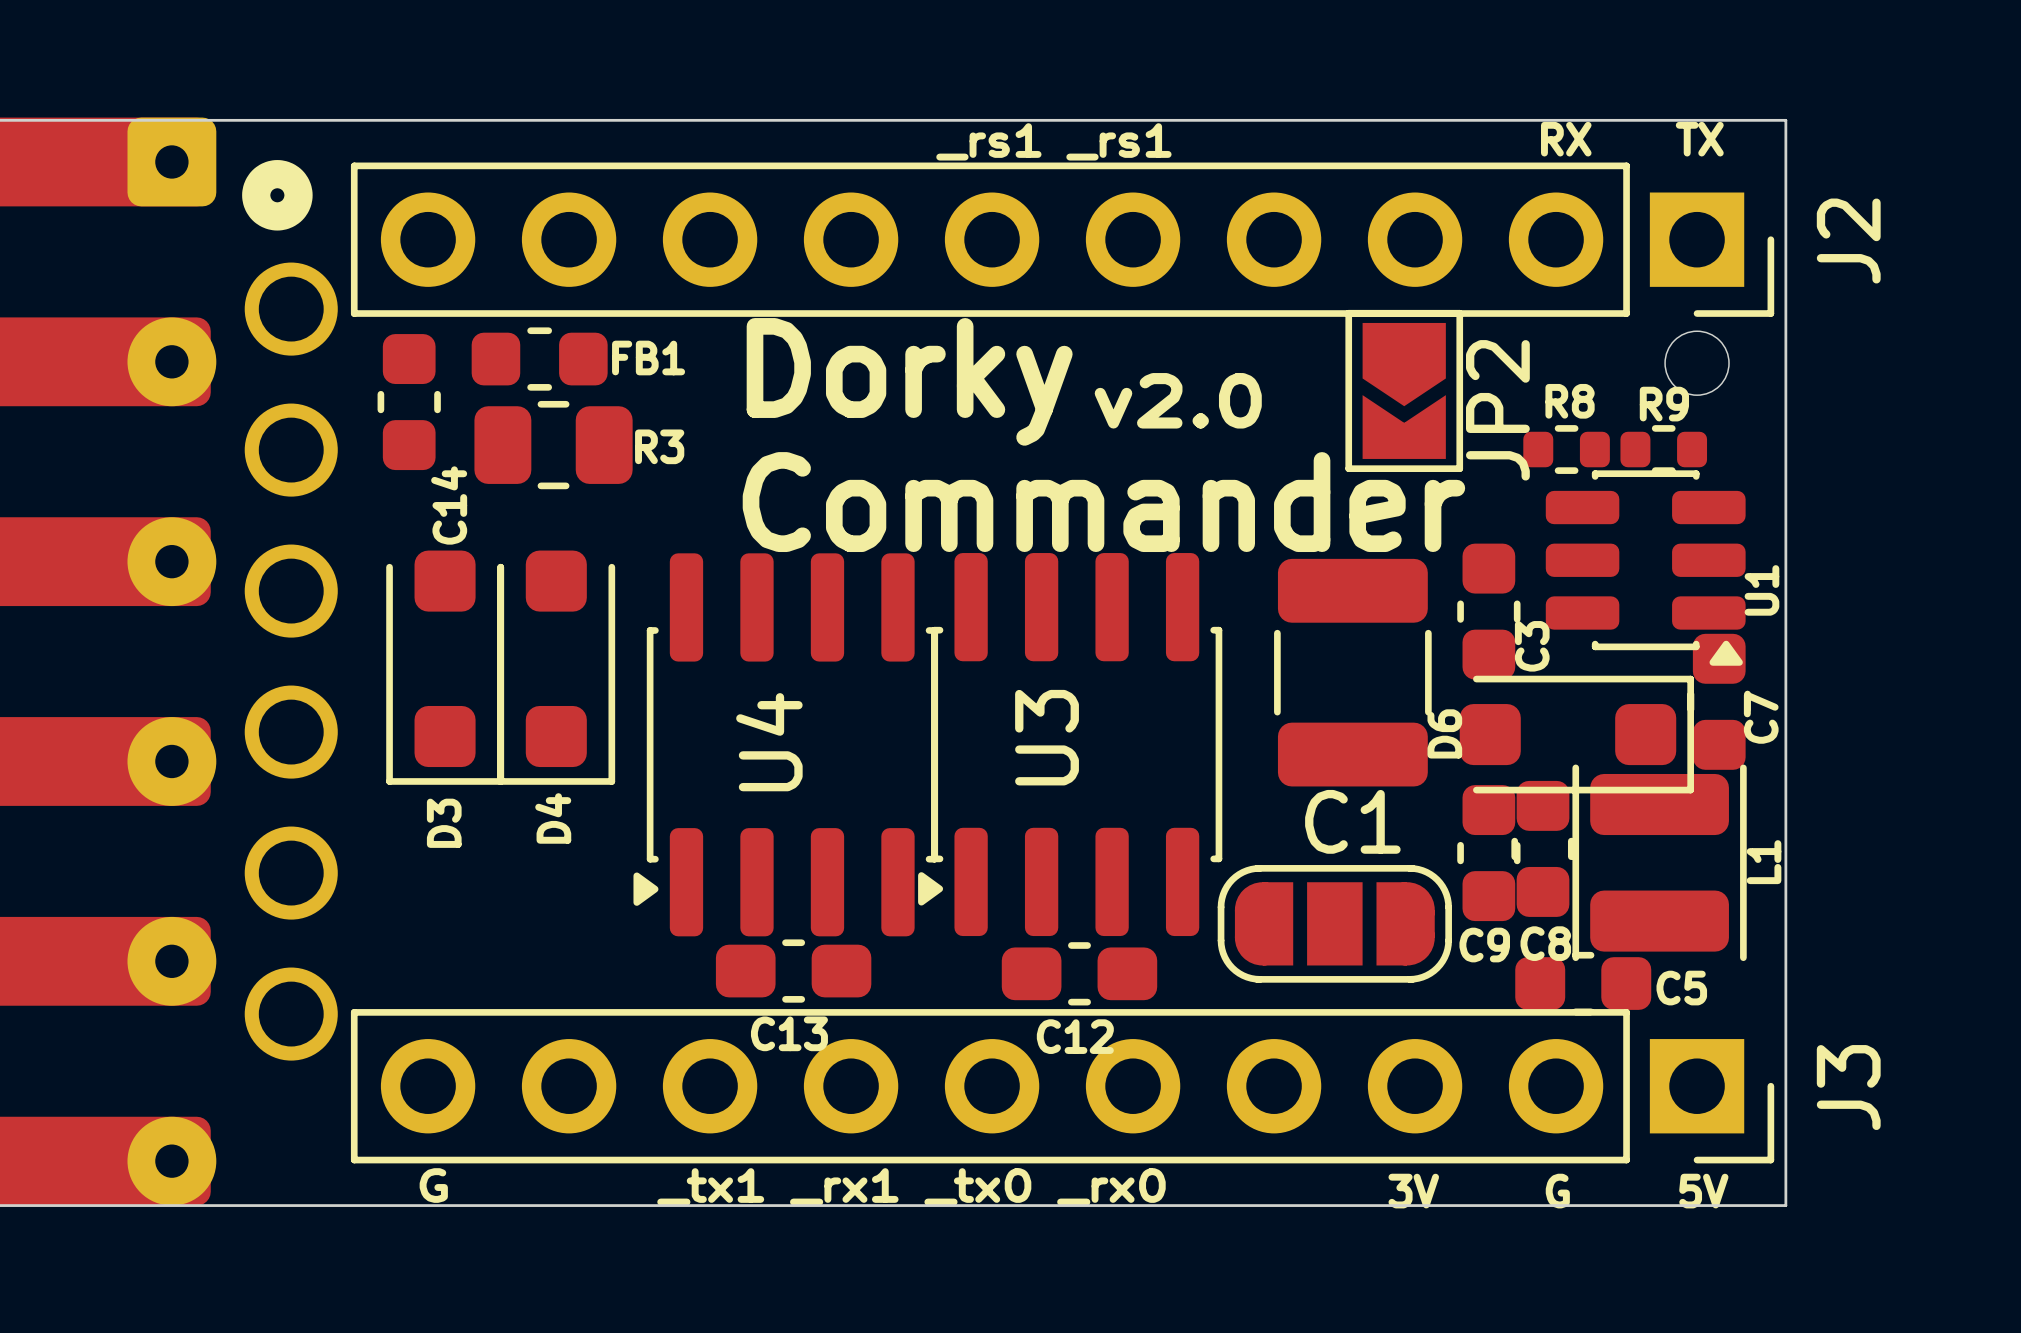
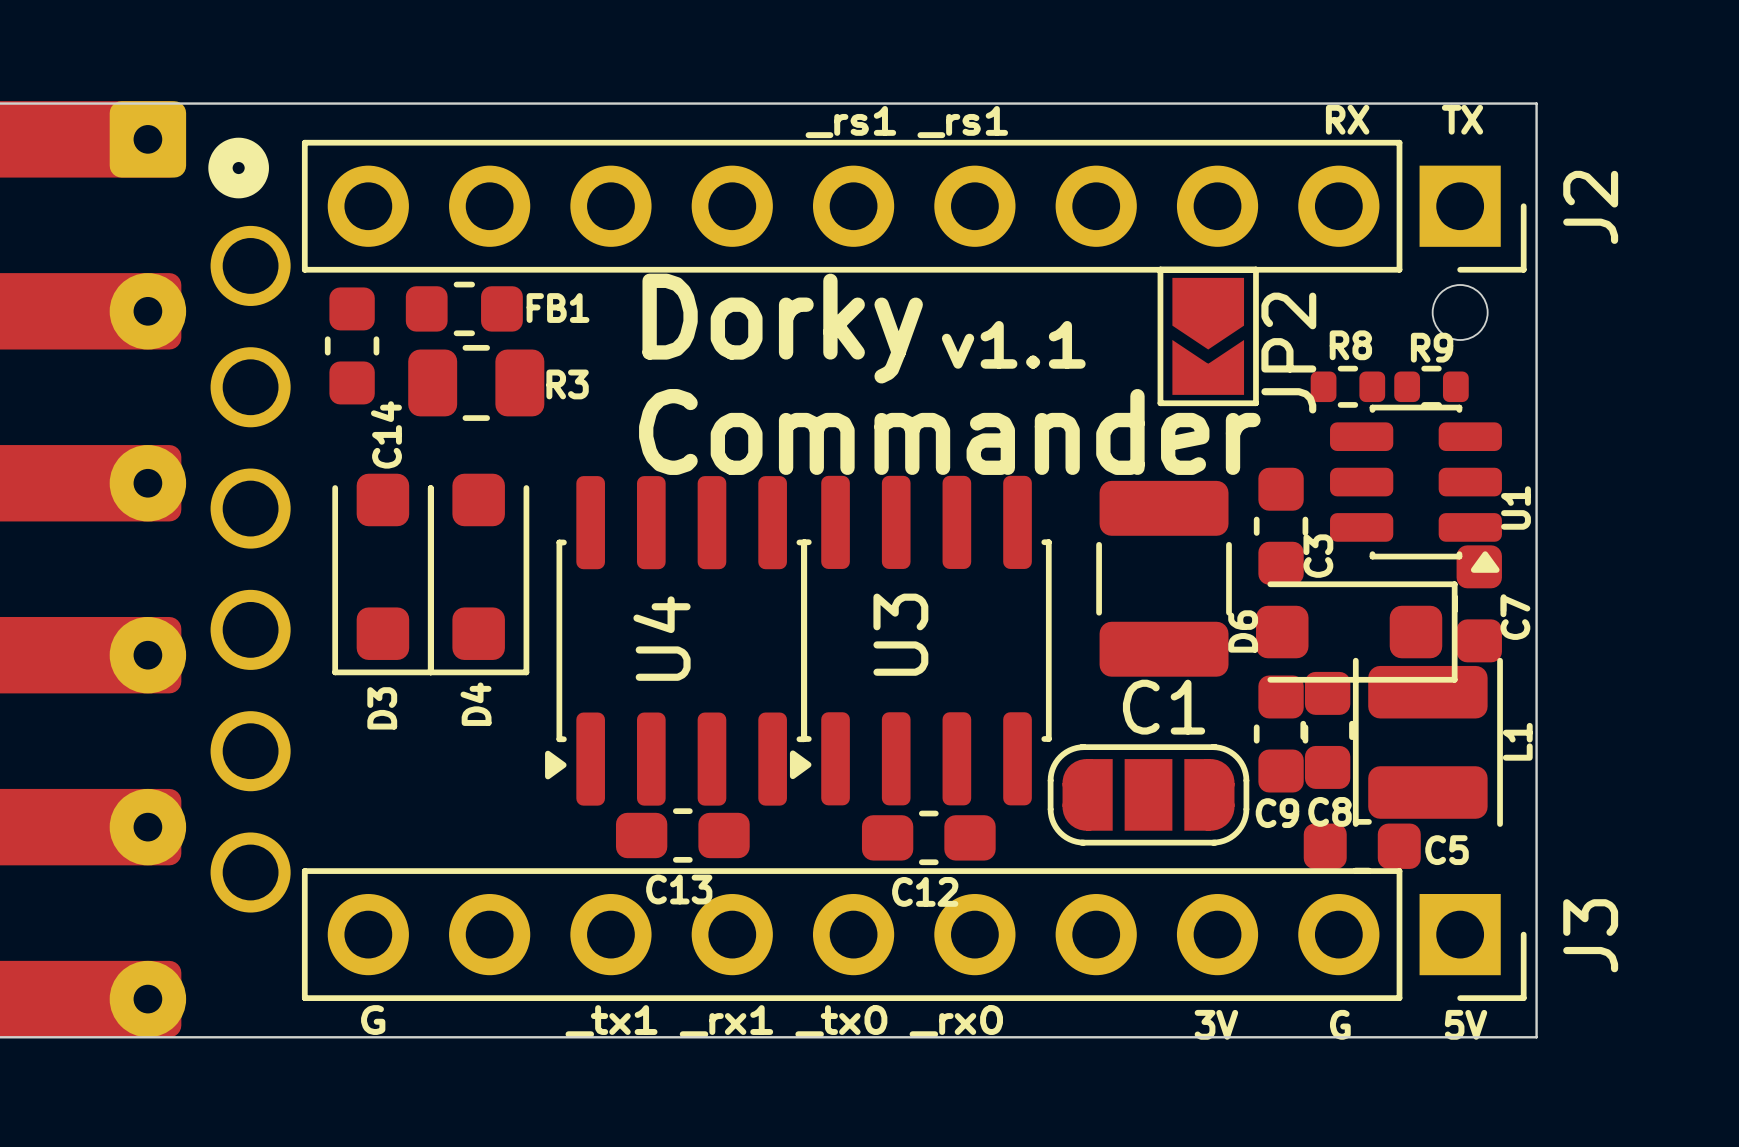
text: v2.0 (1178, 400) -> v1.1 (1013, 344)

